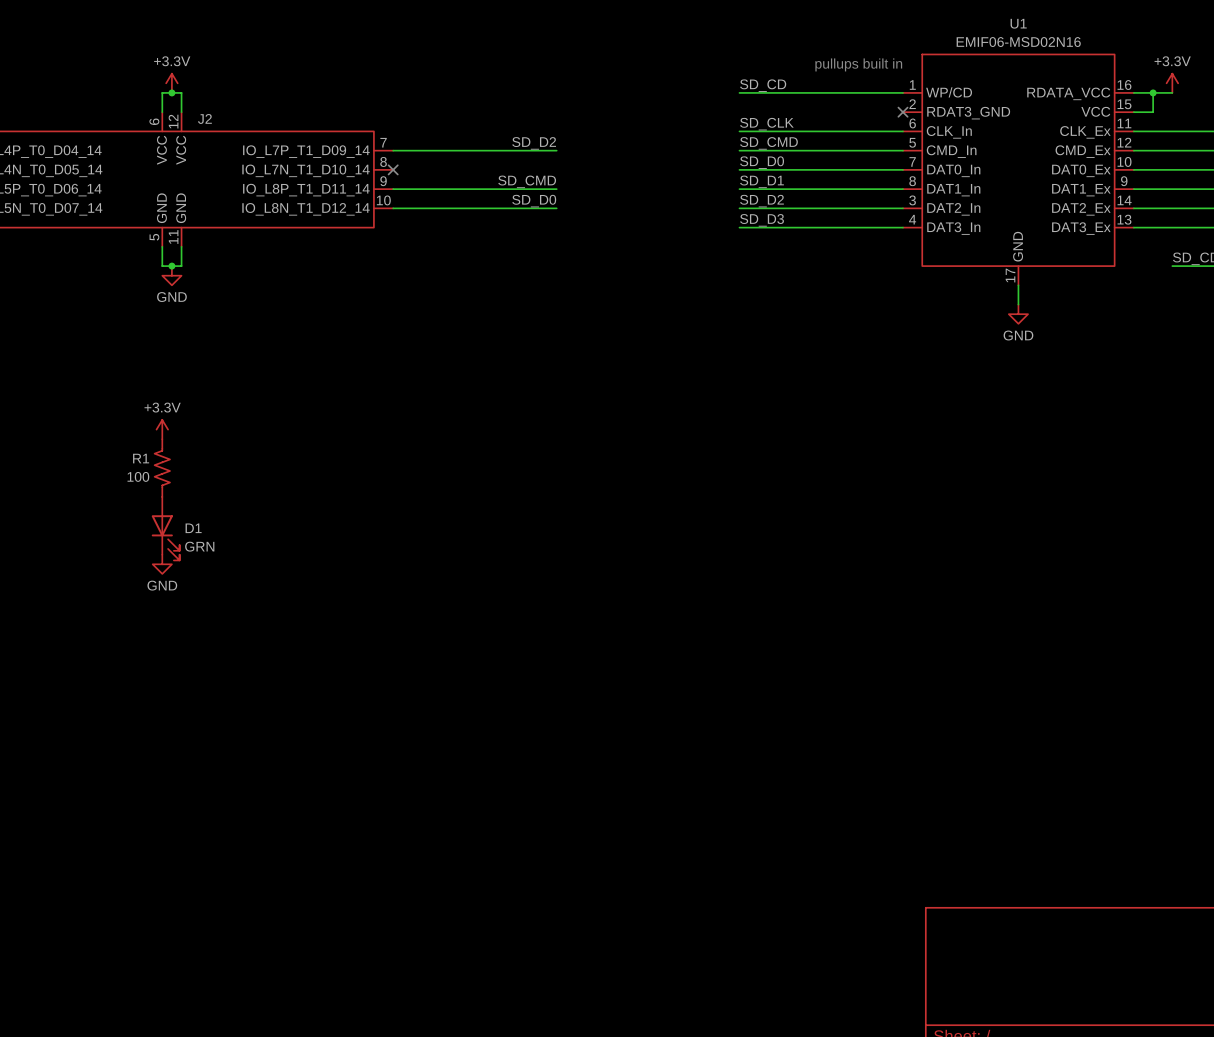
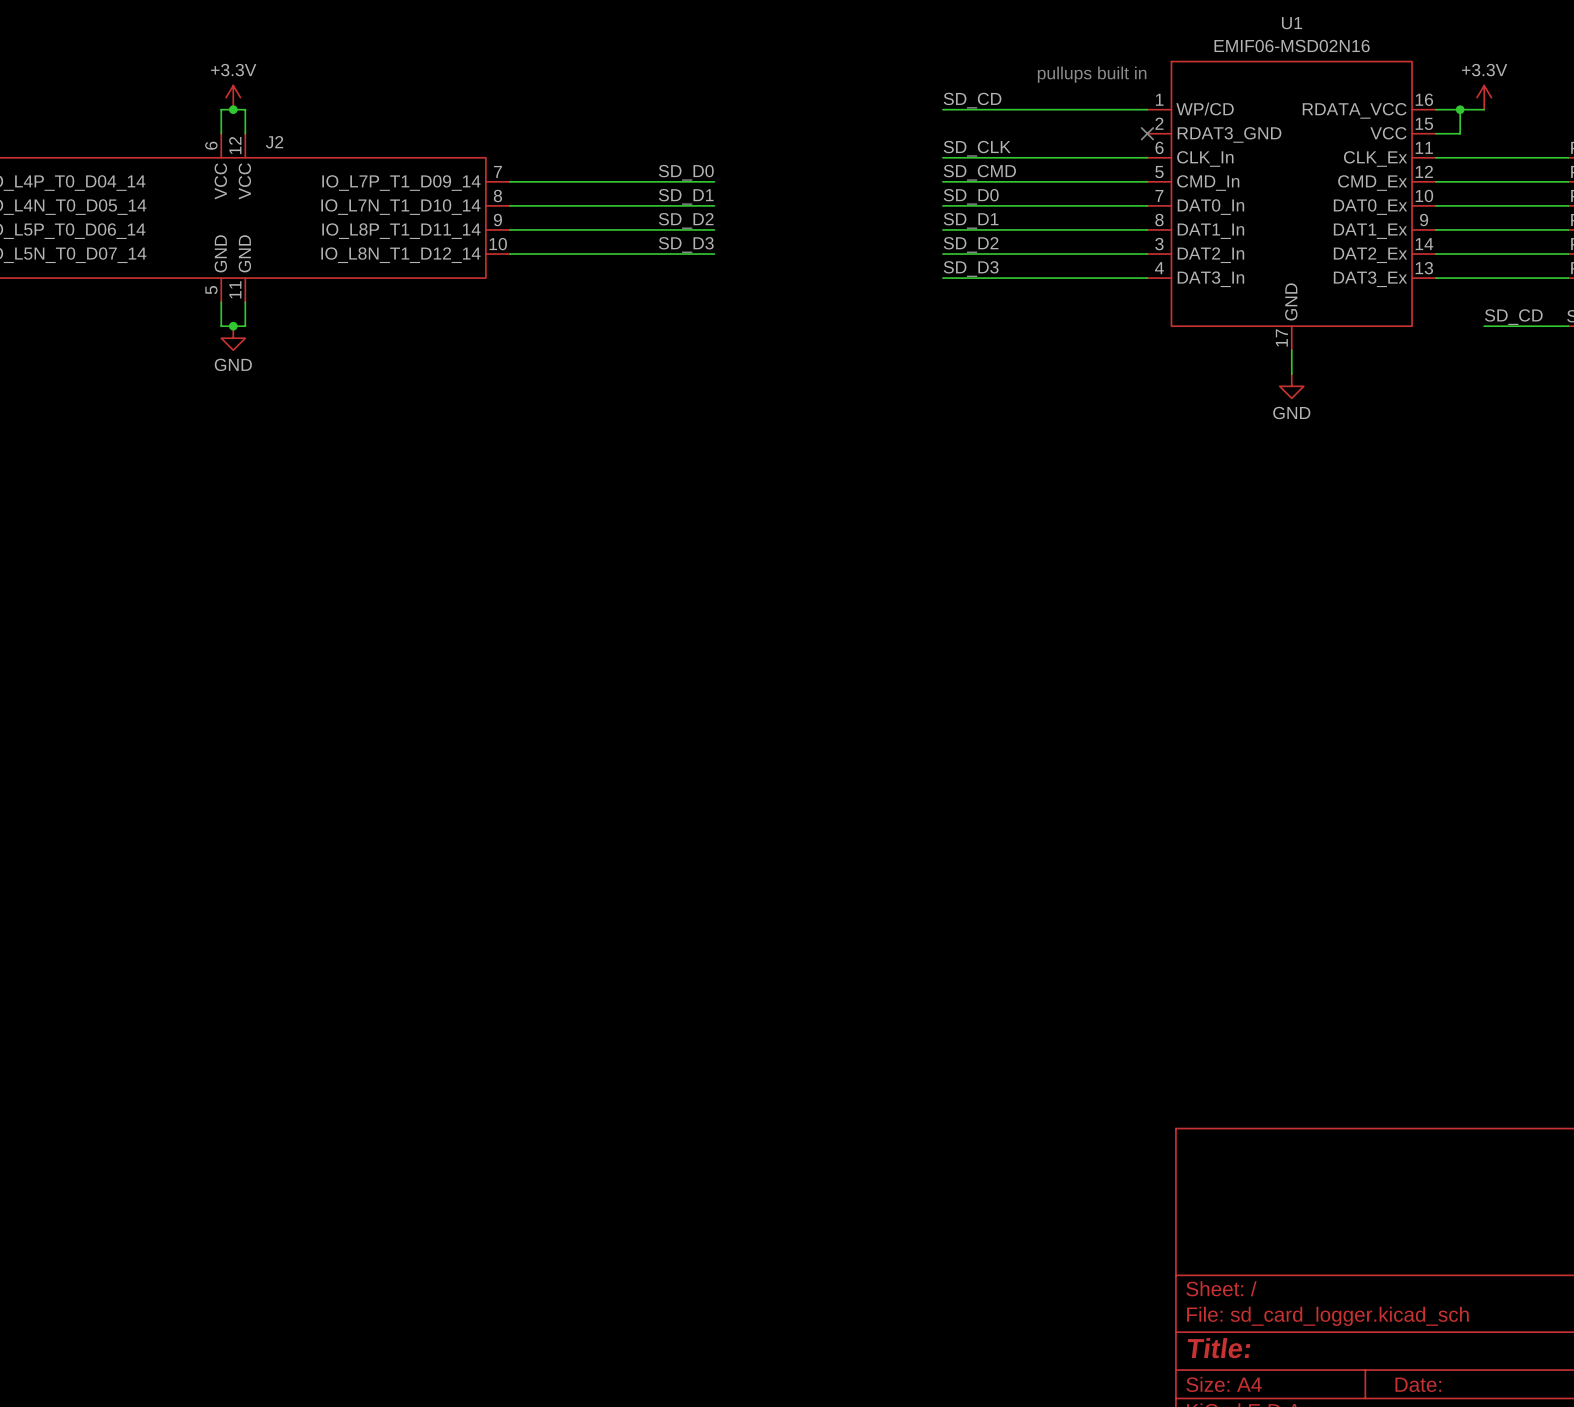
label: SD_D2 (534, 143) -> SD_D0 (686, 172)
label: none -> SD_D1 (686, 196)
wire: none -> (509, 205) (714, 205)
no-connect mark: (393, 169) -> none
label: SD_CMD (527, 181) -> SD_D2 (686, 220)
label: SD_D0 (534, 201) -> SD_D3 (686, 244)
power symbol: +3.3V (162, 429) -> none
R1: 100 (162, 468) -> none
D1: GRN (165, 528) -> none
power symbol: GND (162, 564) -> none

